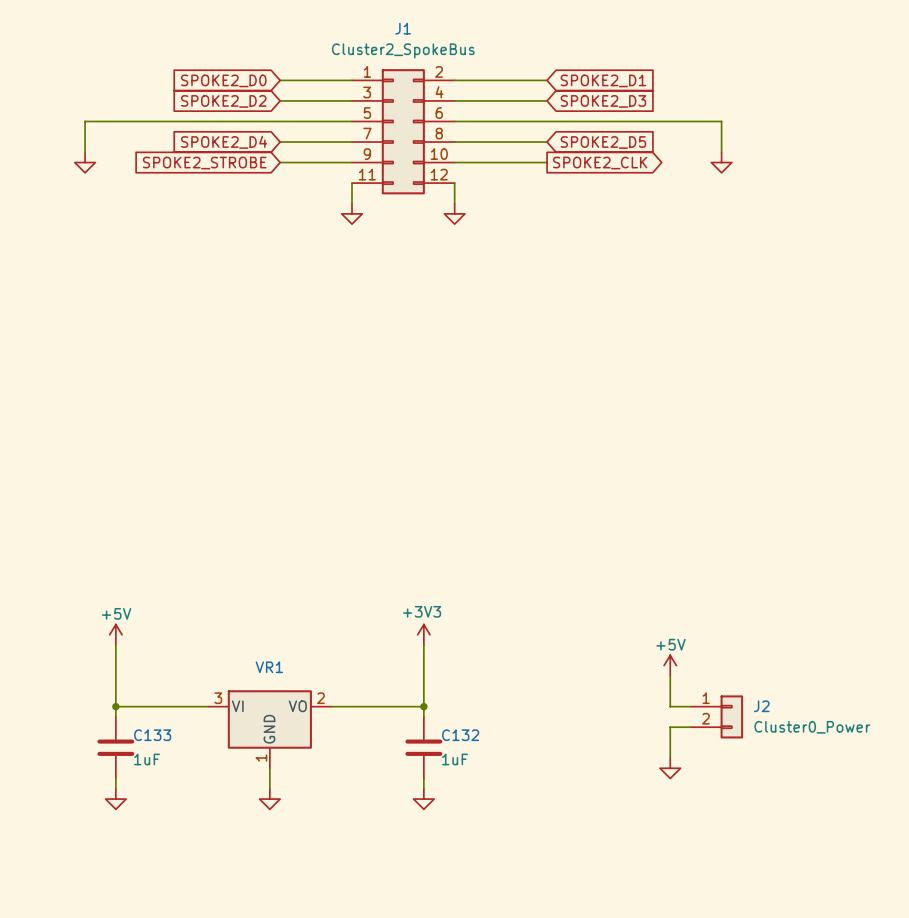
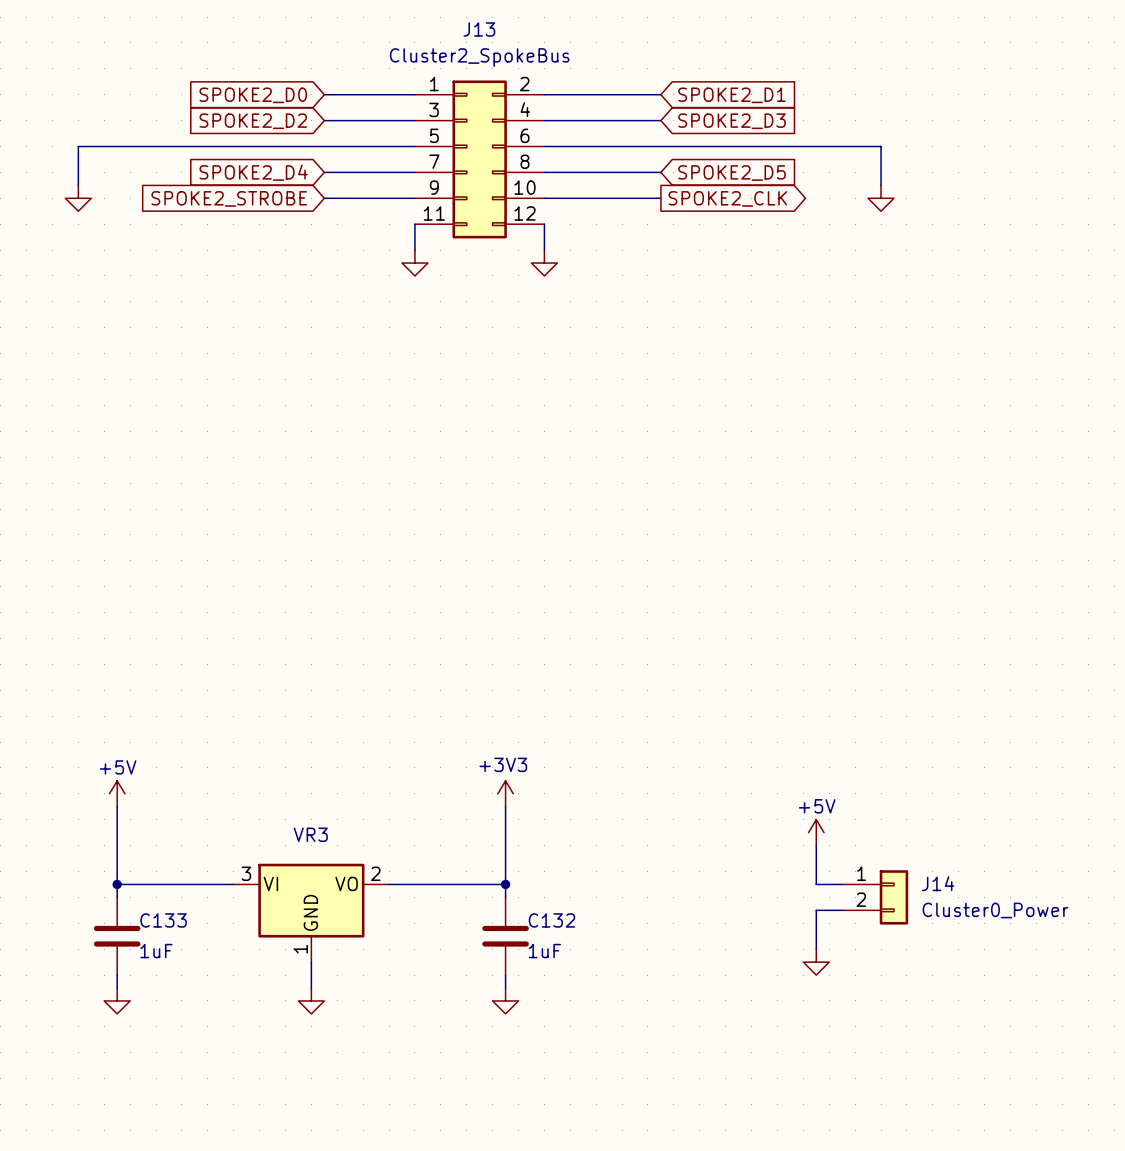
J1 name: J1 (403, 28) -> J13 (479, 29)
VR1 name: VR1 (269, 667) -> VR3 (310, 834)
J2 name: J2 (761, 706) -> J14 (938, 883)

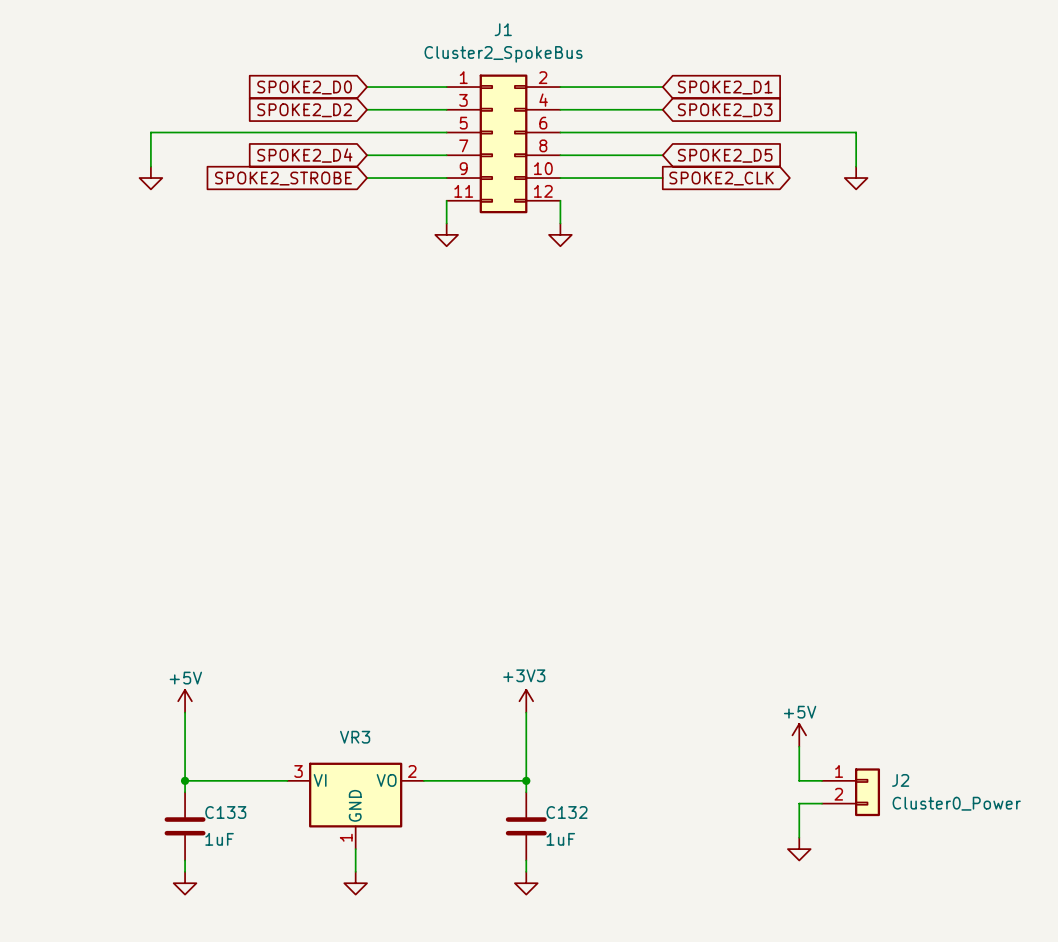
J13 name: J13 (479, 29) -> J1 (503, 29)
J14 name: J14 (938, 883) -> J2 (900, 780)

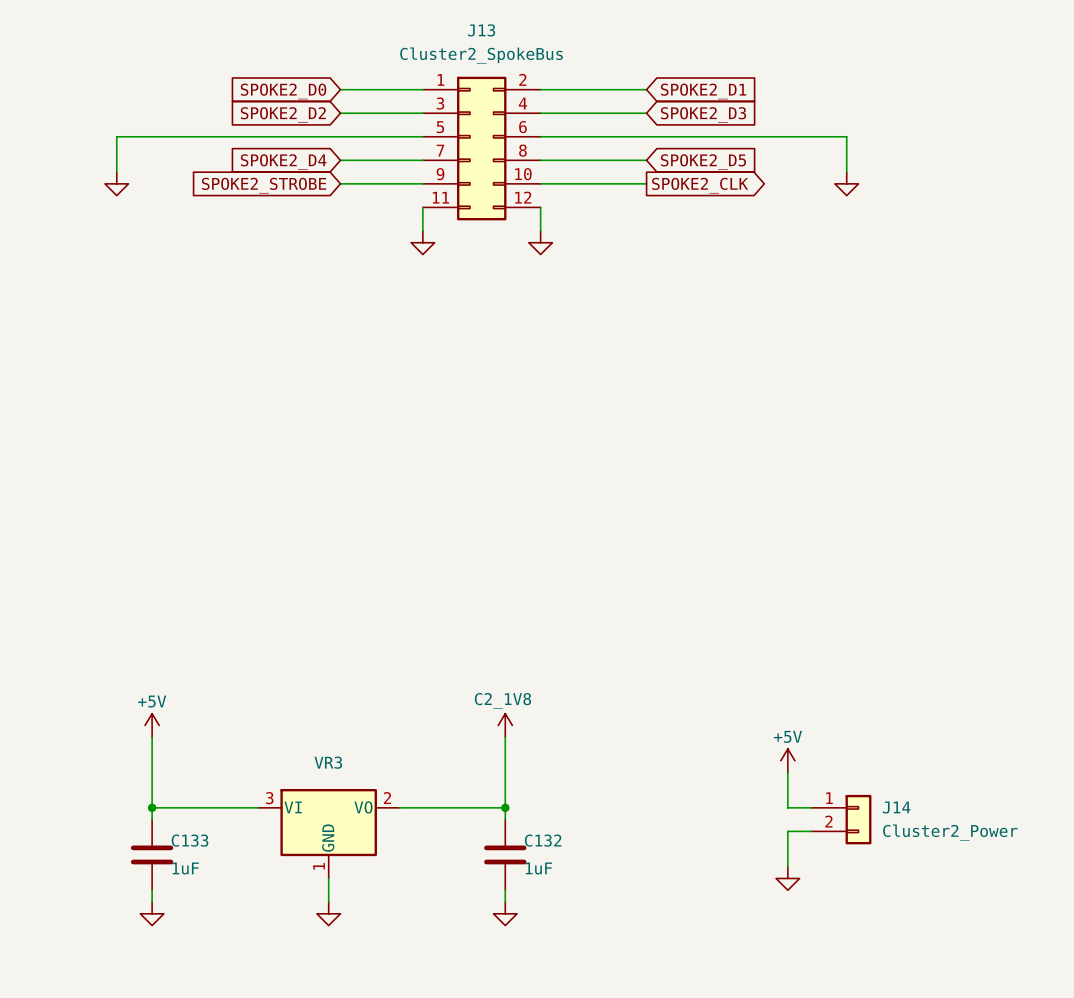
J1 name: J1 (503, 29) -> J13 (481, 30)
power symbol: +3V3 (526, 701) -> C2_1V8 (505, 725)
J2 name: J2 (900, 780) -> J14 (896, 807)
J2 value: Cluster0_Power (956, 803) -> Cluster2_Power (950, 832)

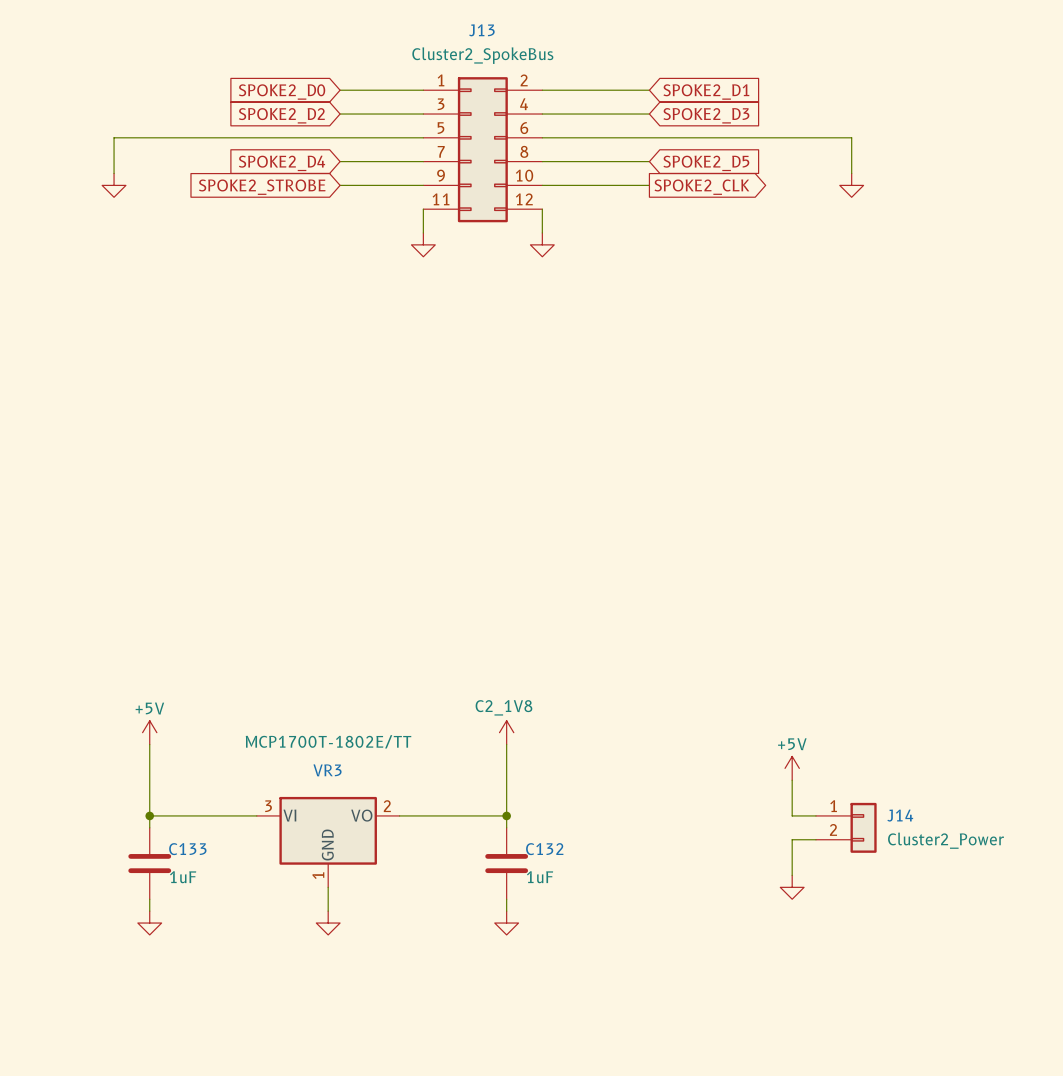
VR3 value: none -> MCP1700T-1802E/TT (328, 741)

